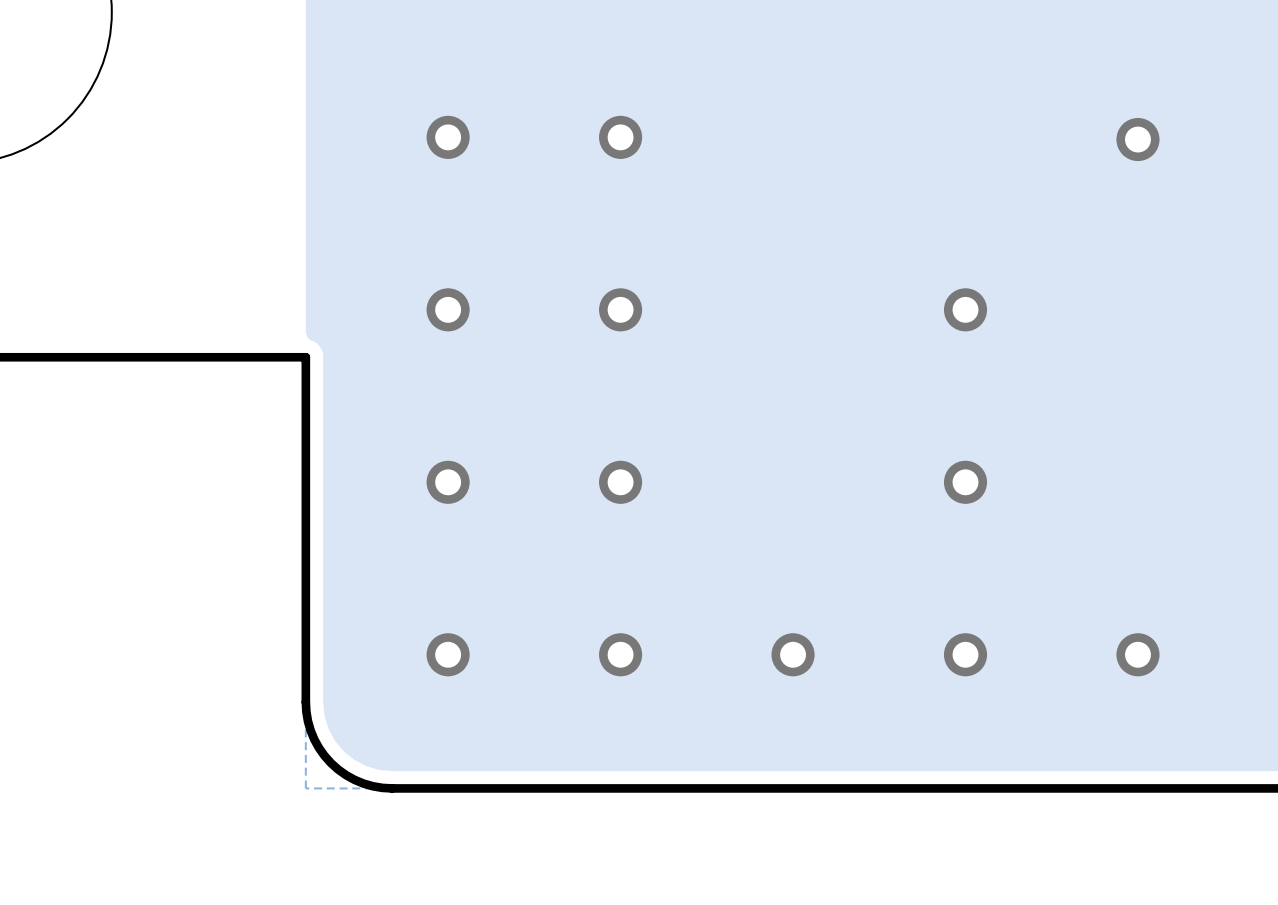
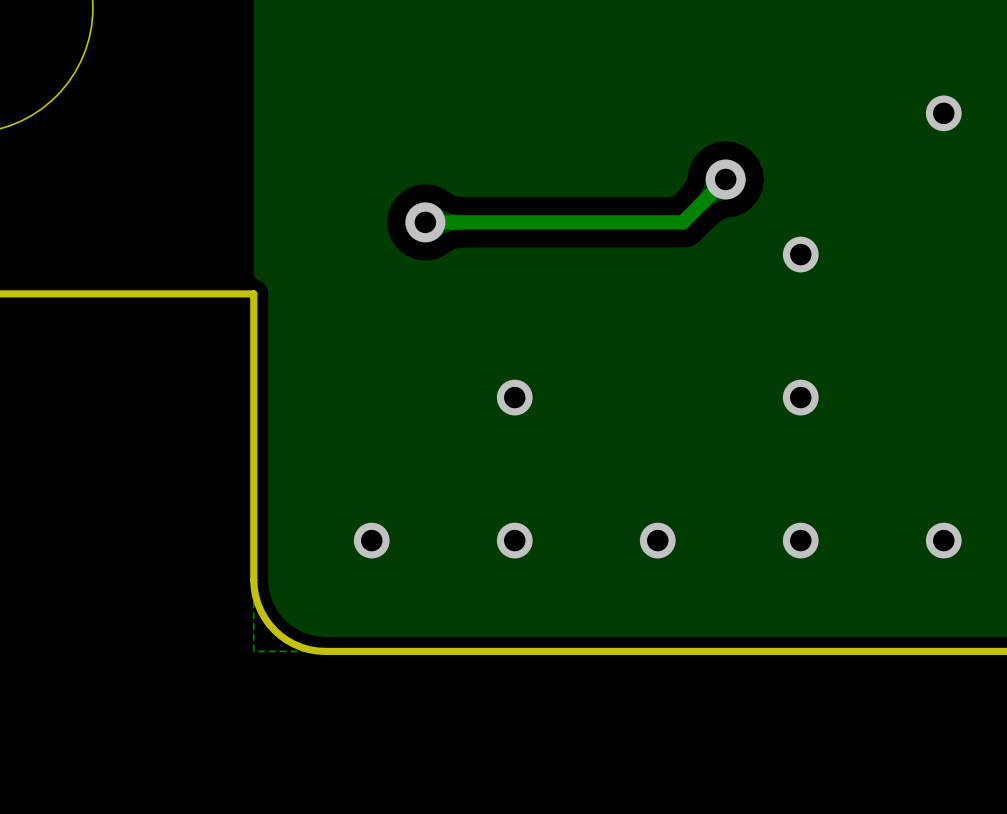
via: (448, 137) -> none
via: (620, 137) -> none
track: none -> (725, 179) (682, 222) (425, 222)
via: none -> (725, 179)
via: none -> (425, 222)
via: (448, 309) -> none
via: (620, 309) -> none
via: (448, 482) -> none

